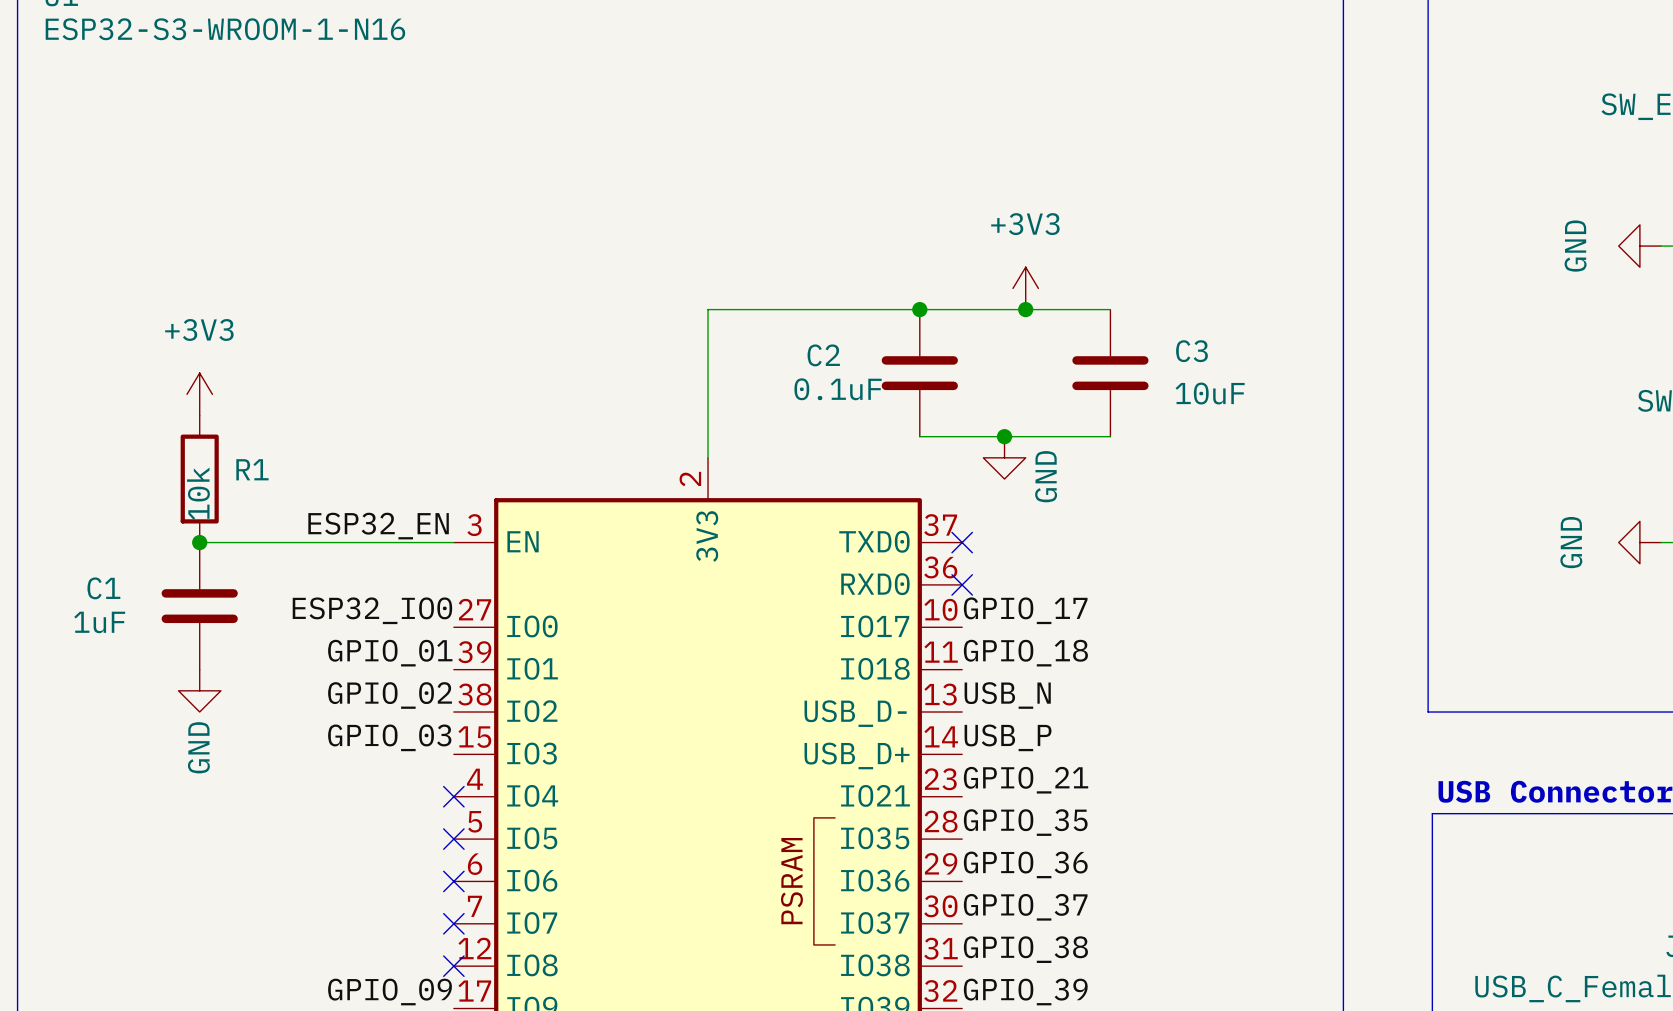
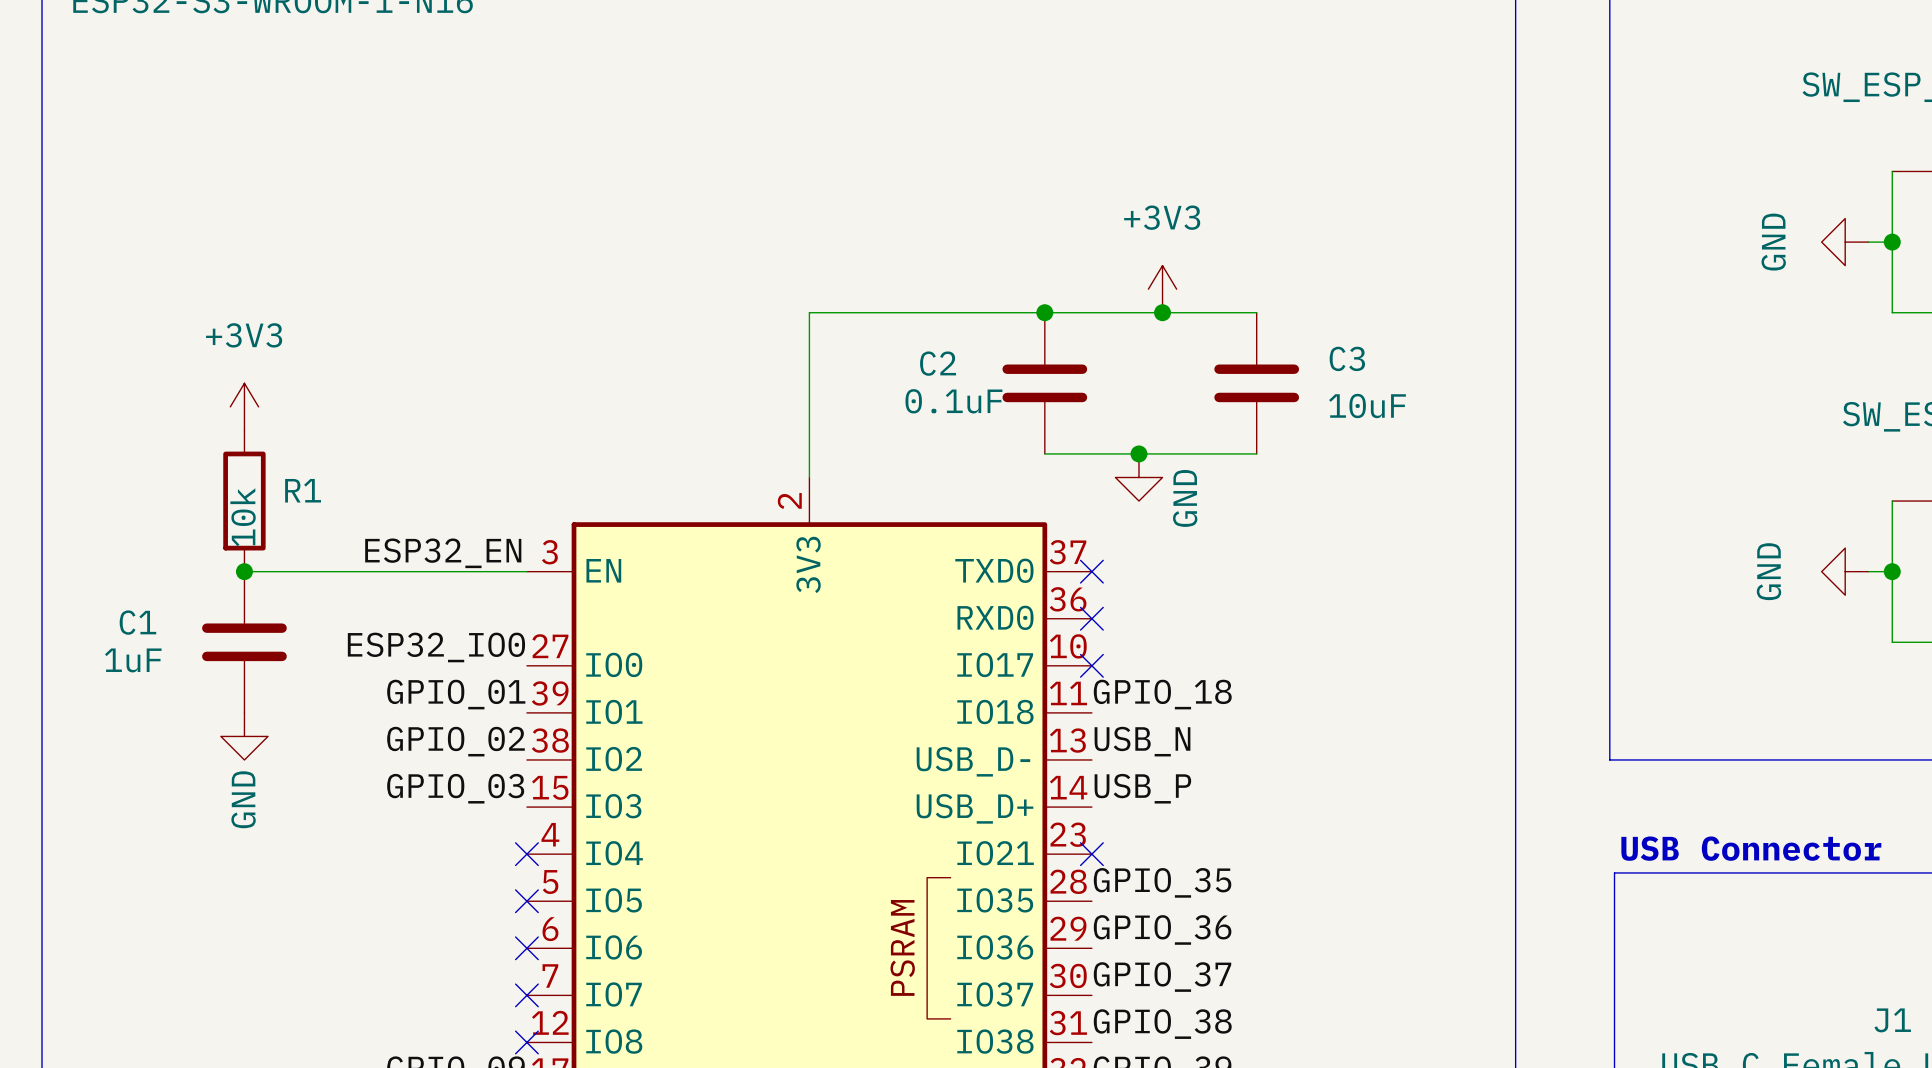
label: GPIO_17 (1025, 610) -> none
no-connect mark: none -> (1091, 665)
label: GPIO_21 (1026, 780) -> none
no-connect mark: none -> (1091, 854)

